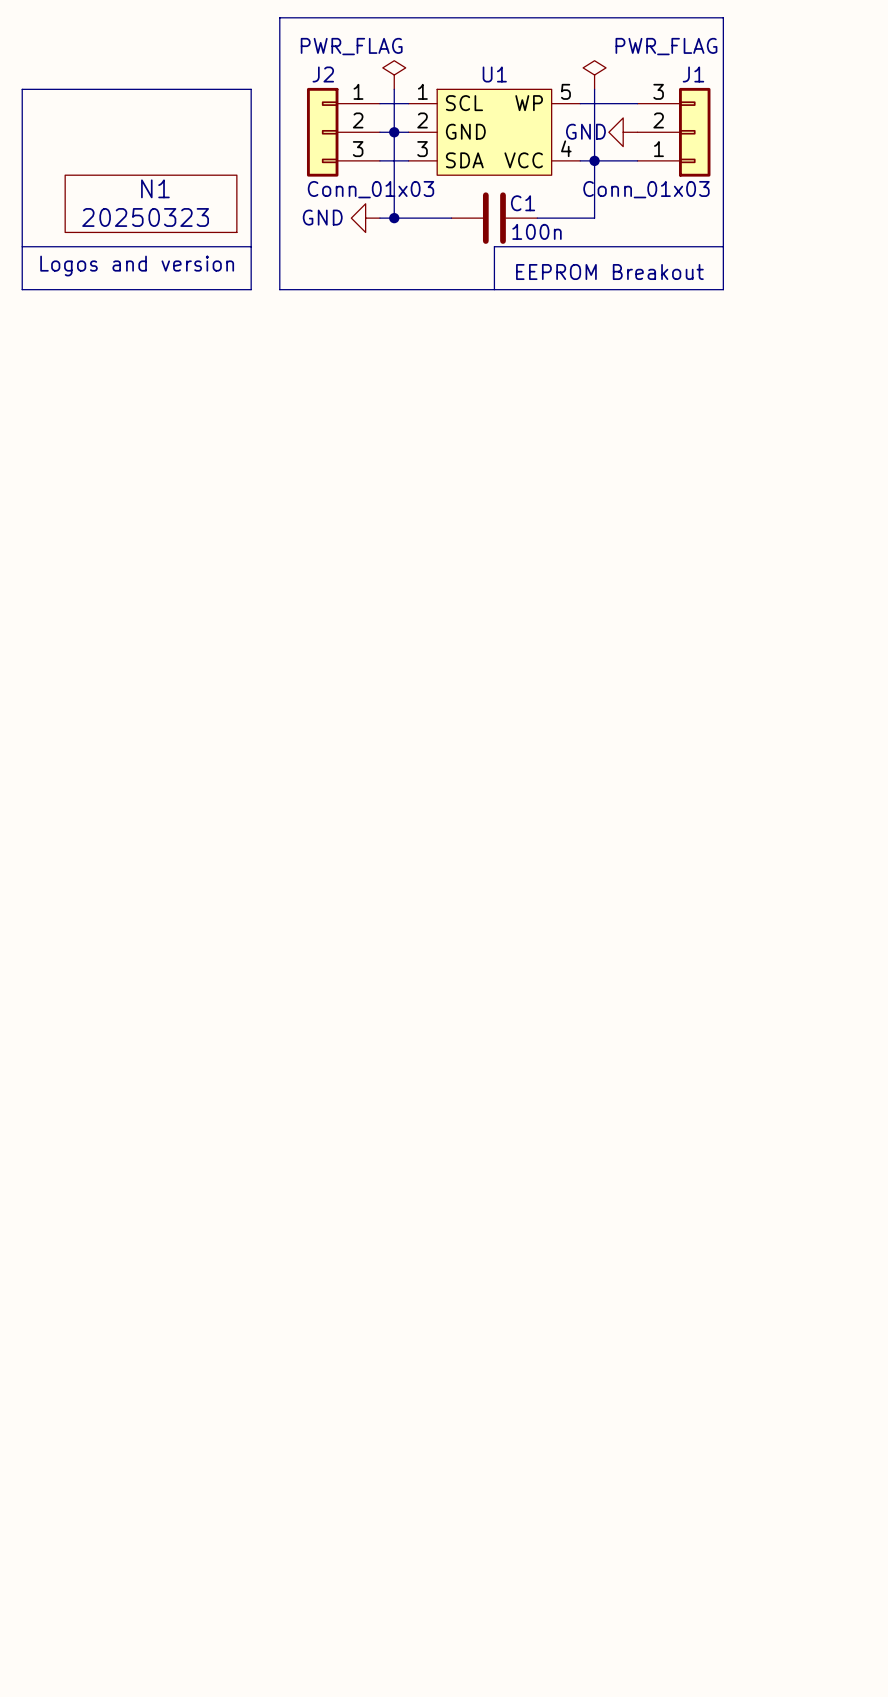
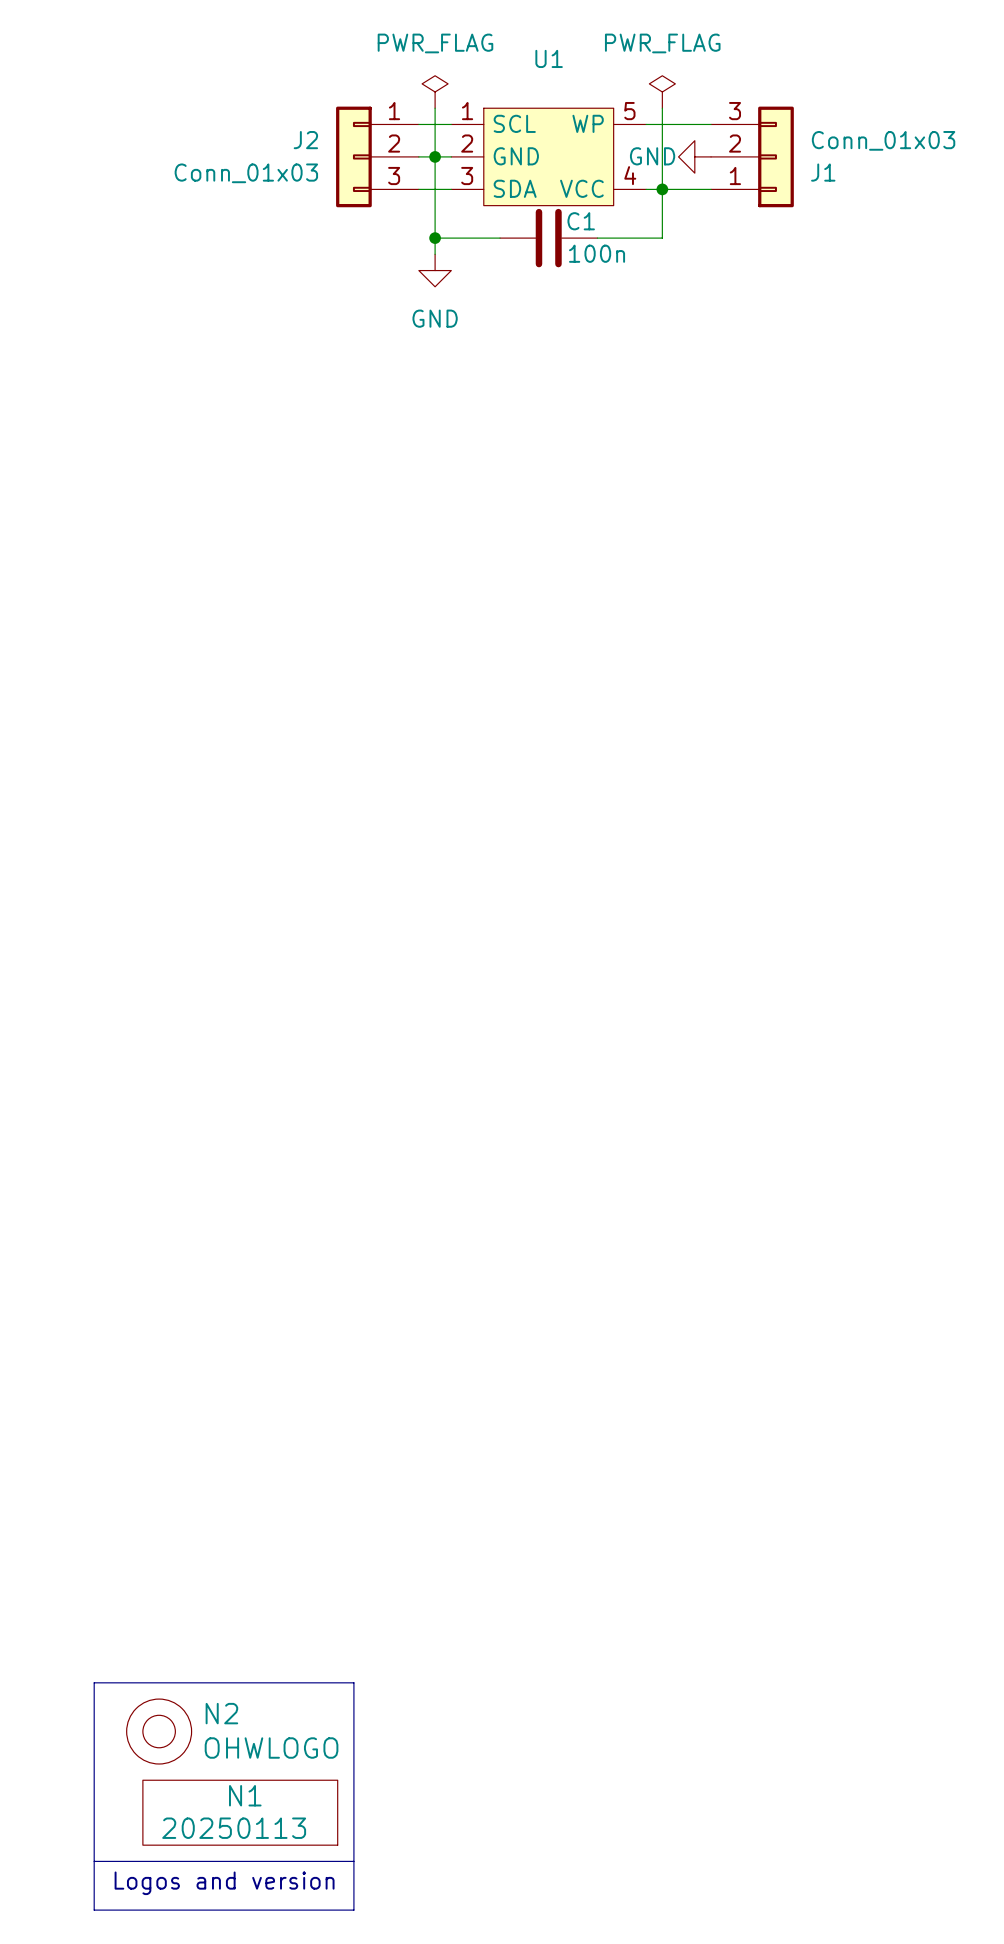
line: (279, 17) (279, 289) (723, 289) (723, 17) (279, 17) -> none
power symbol text position: PWR_FLAG (351, 46) -> PWR_FLAG (435, 43)
power symbol text position: PWR_FLAG (666, 46) -> PWR_FLAG (662, 43)
J2 name position: J2 (323, 74) -> J2 (305, 140)
U1 name position: U1 (494, 74) -> U1 (549, 58)
J1 name position: J1 (693, 74) -> J1 (823, 172)
line: (22, 89) (22, 289) (251, 289) (251, 89) (22, 89) -> none
J2 value position: Conn_01x03 (370, 189) -> Conn_01x03 (246, 173)
J1 value position: Conn_01x03 (646, 189) -> Conn_01x03 (883, 140)
N1 position: (151, 203) -> (240, 1812)
wire: none -> (435, 238) (500, 238)
wire: (594, 203) (594, 218) (537, 218) -> (662, 238) (597, 238)
N1 value: 20250323 (145, 217) -> 20250113 (234, 1828)
power symbol rotation: 0° (365, 218) -> 90° counterclockwise (435, 270)
power symbol position: GND (365, 218) -> GND (435, 270)
wire: (379, 218) (451, 218) -> none
junction position: (394, 218) -> (435, 238)
C1 position: (494, 218) -> (548, 238)
line: (22, 246) (251, 246) -> none
line: (723, 246) (494, 246) (494, 289) -> none
text: Logos and version (137, 266) -> none
text: EEPROM Breakout (609, 272) -> none
line: none -> (94, 1682) (94, 1910) (353, 1910) (353, 1682) (94, 1682)
N2: none -> OHWLOGO (159, 1731)
line: none -> (94, 1861) (353, 1861)
text: none -> Logos and version (224, 1883)

